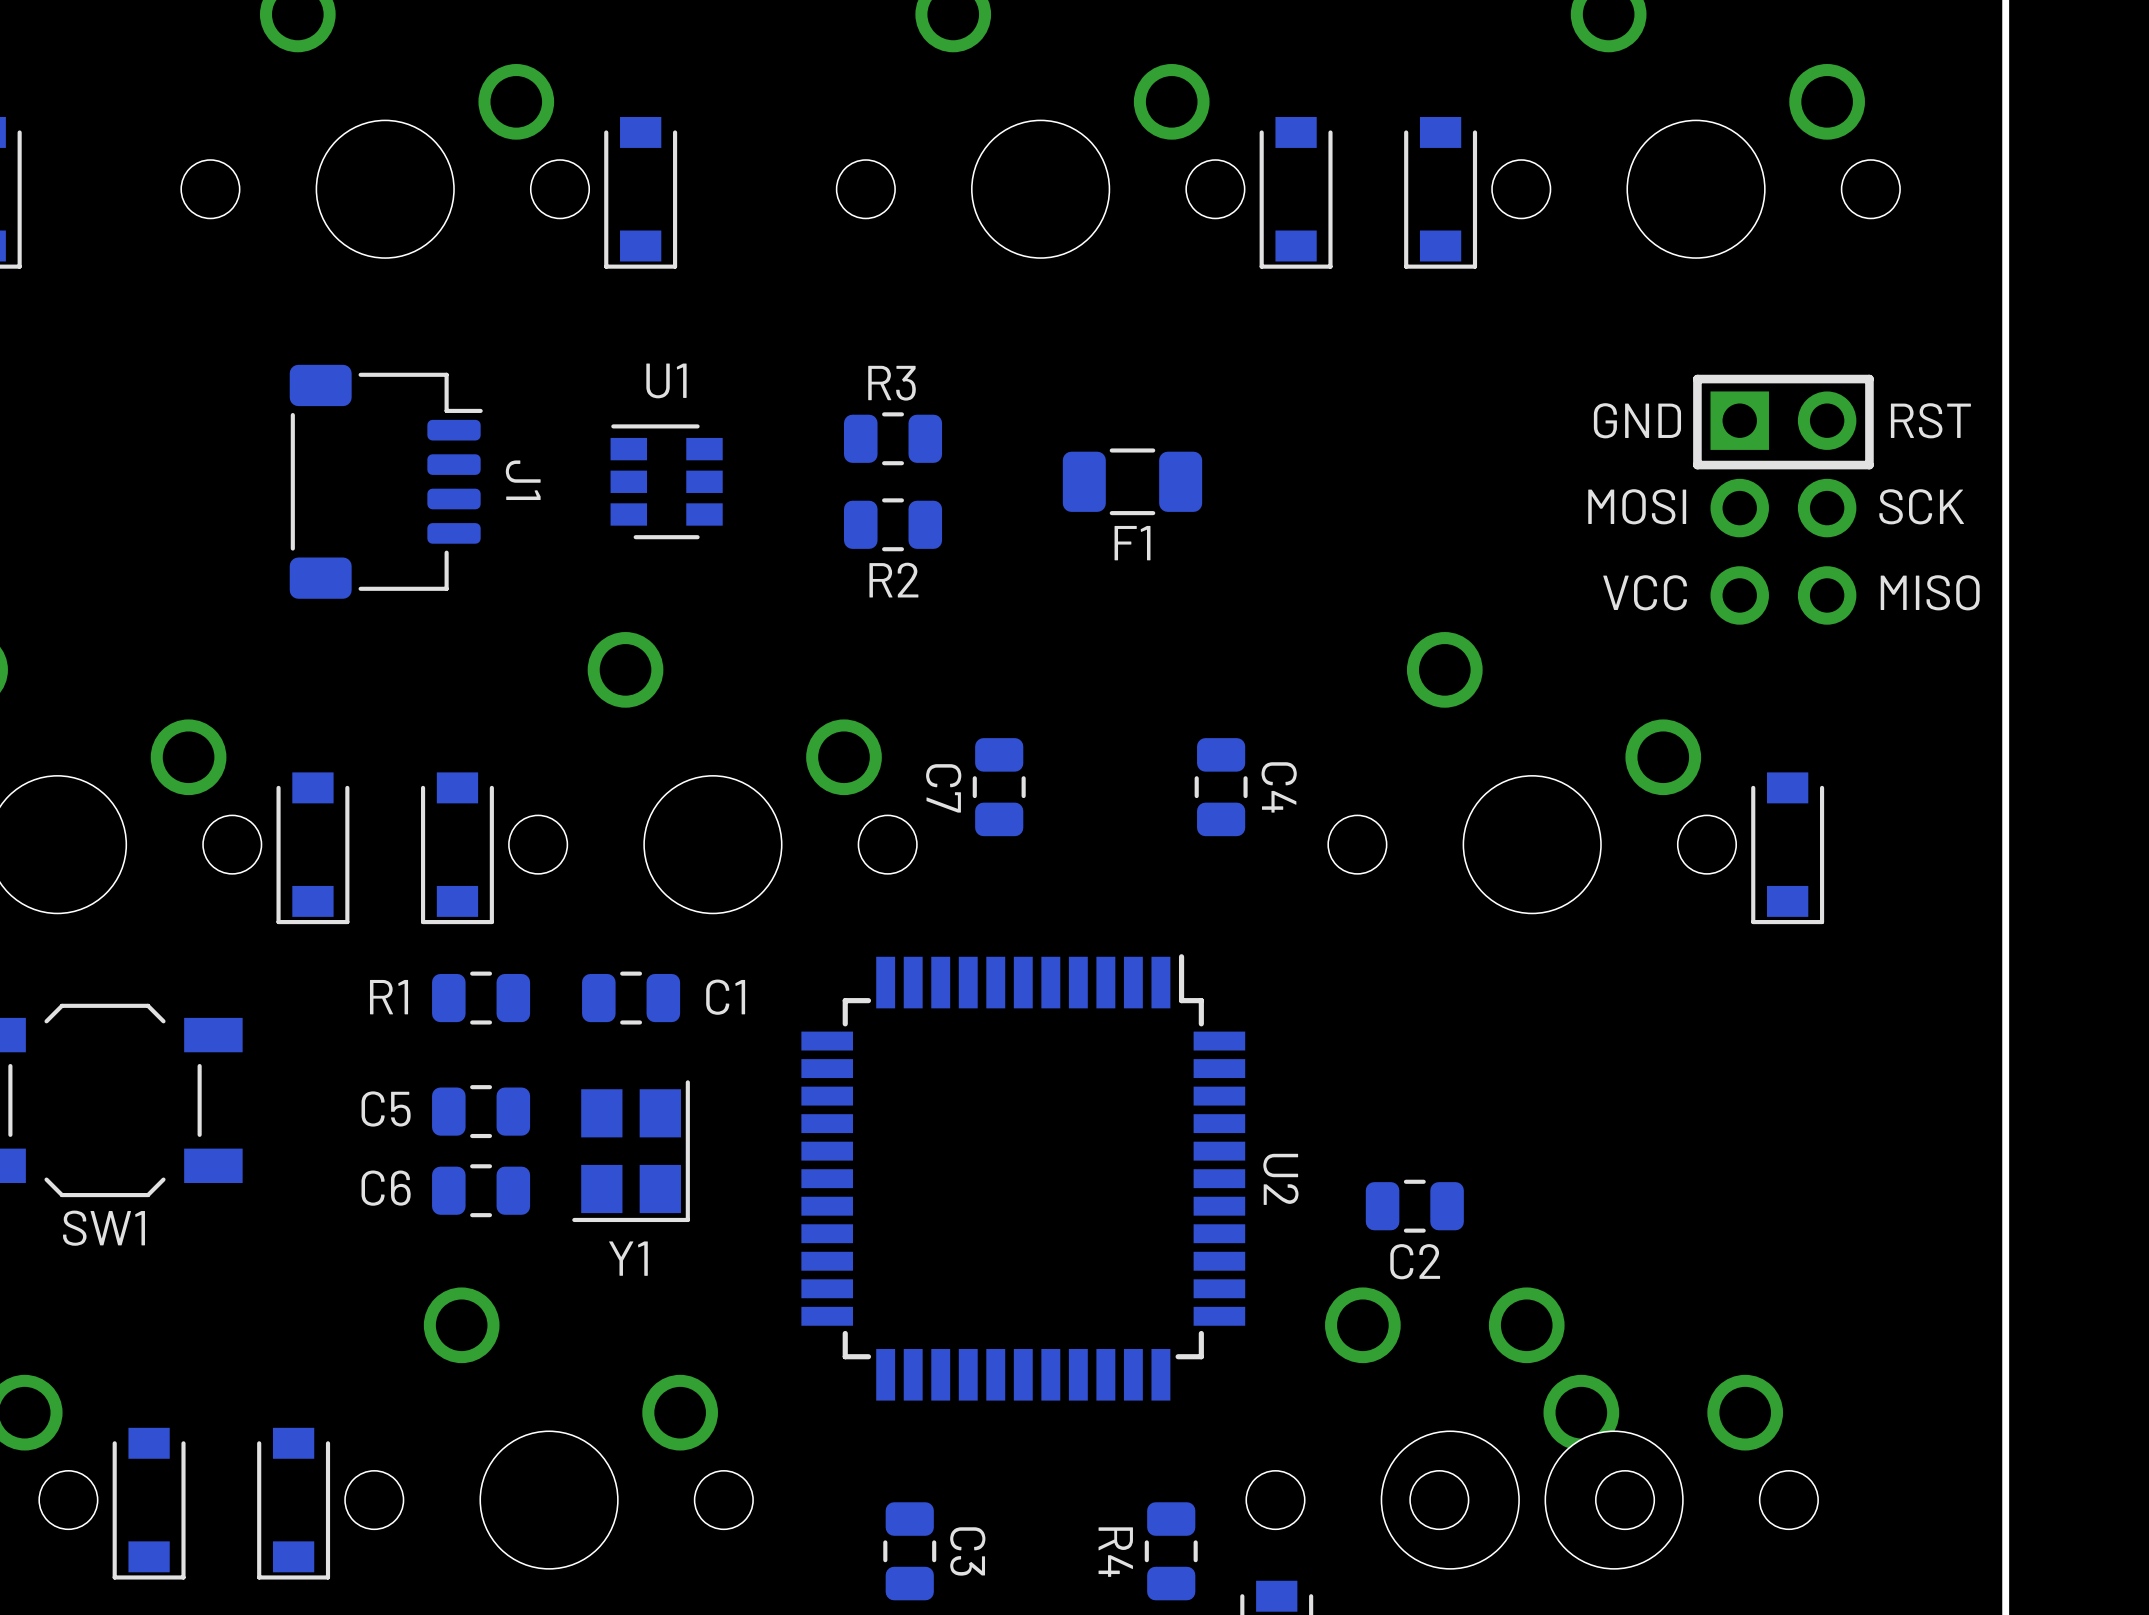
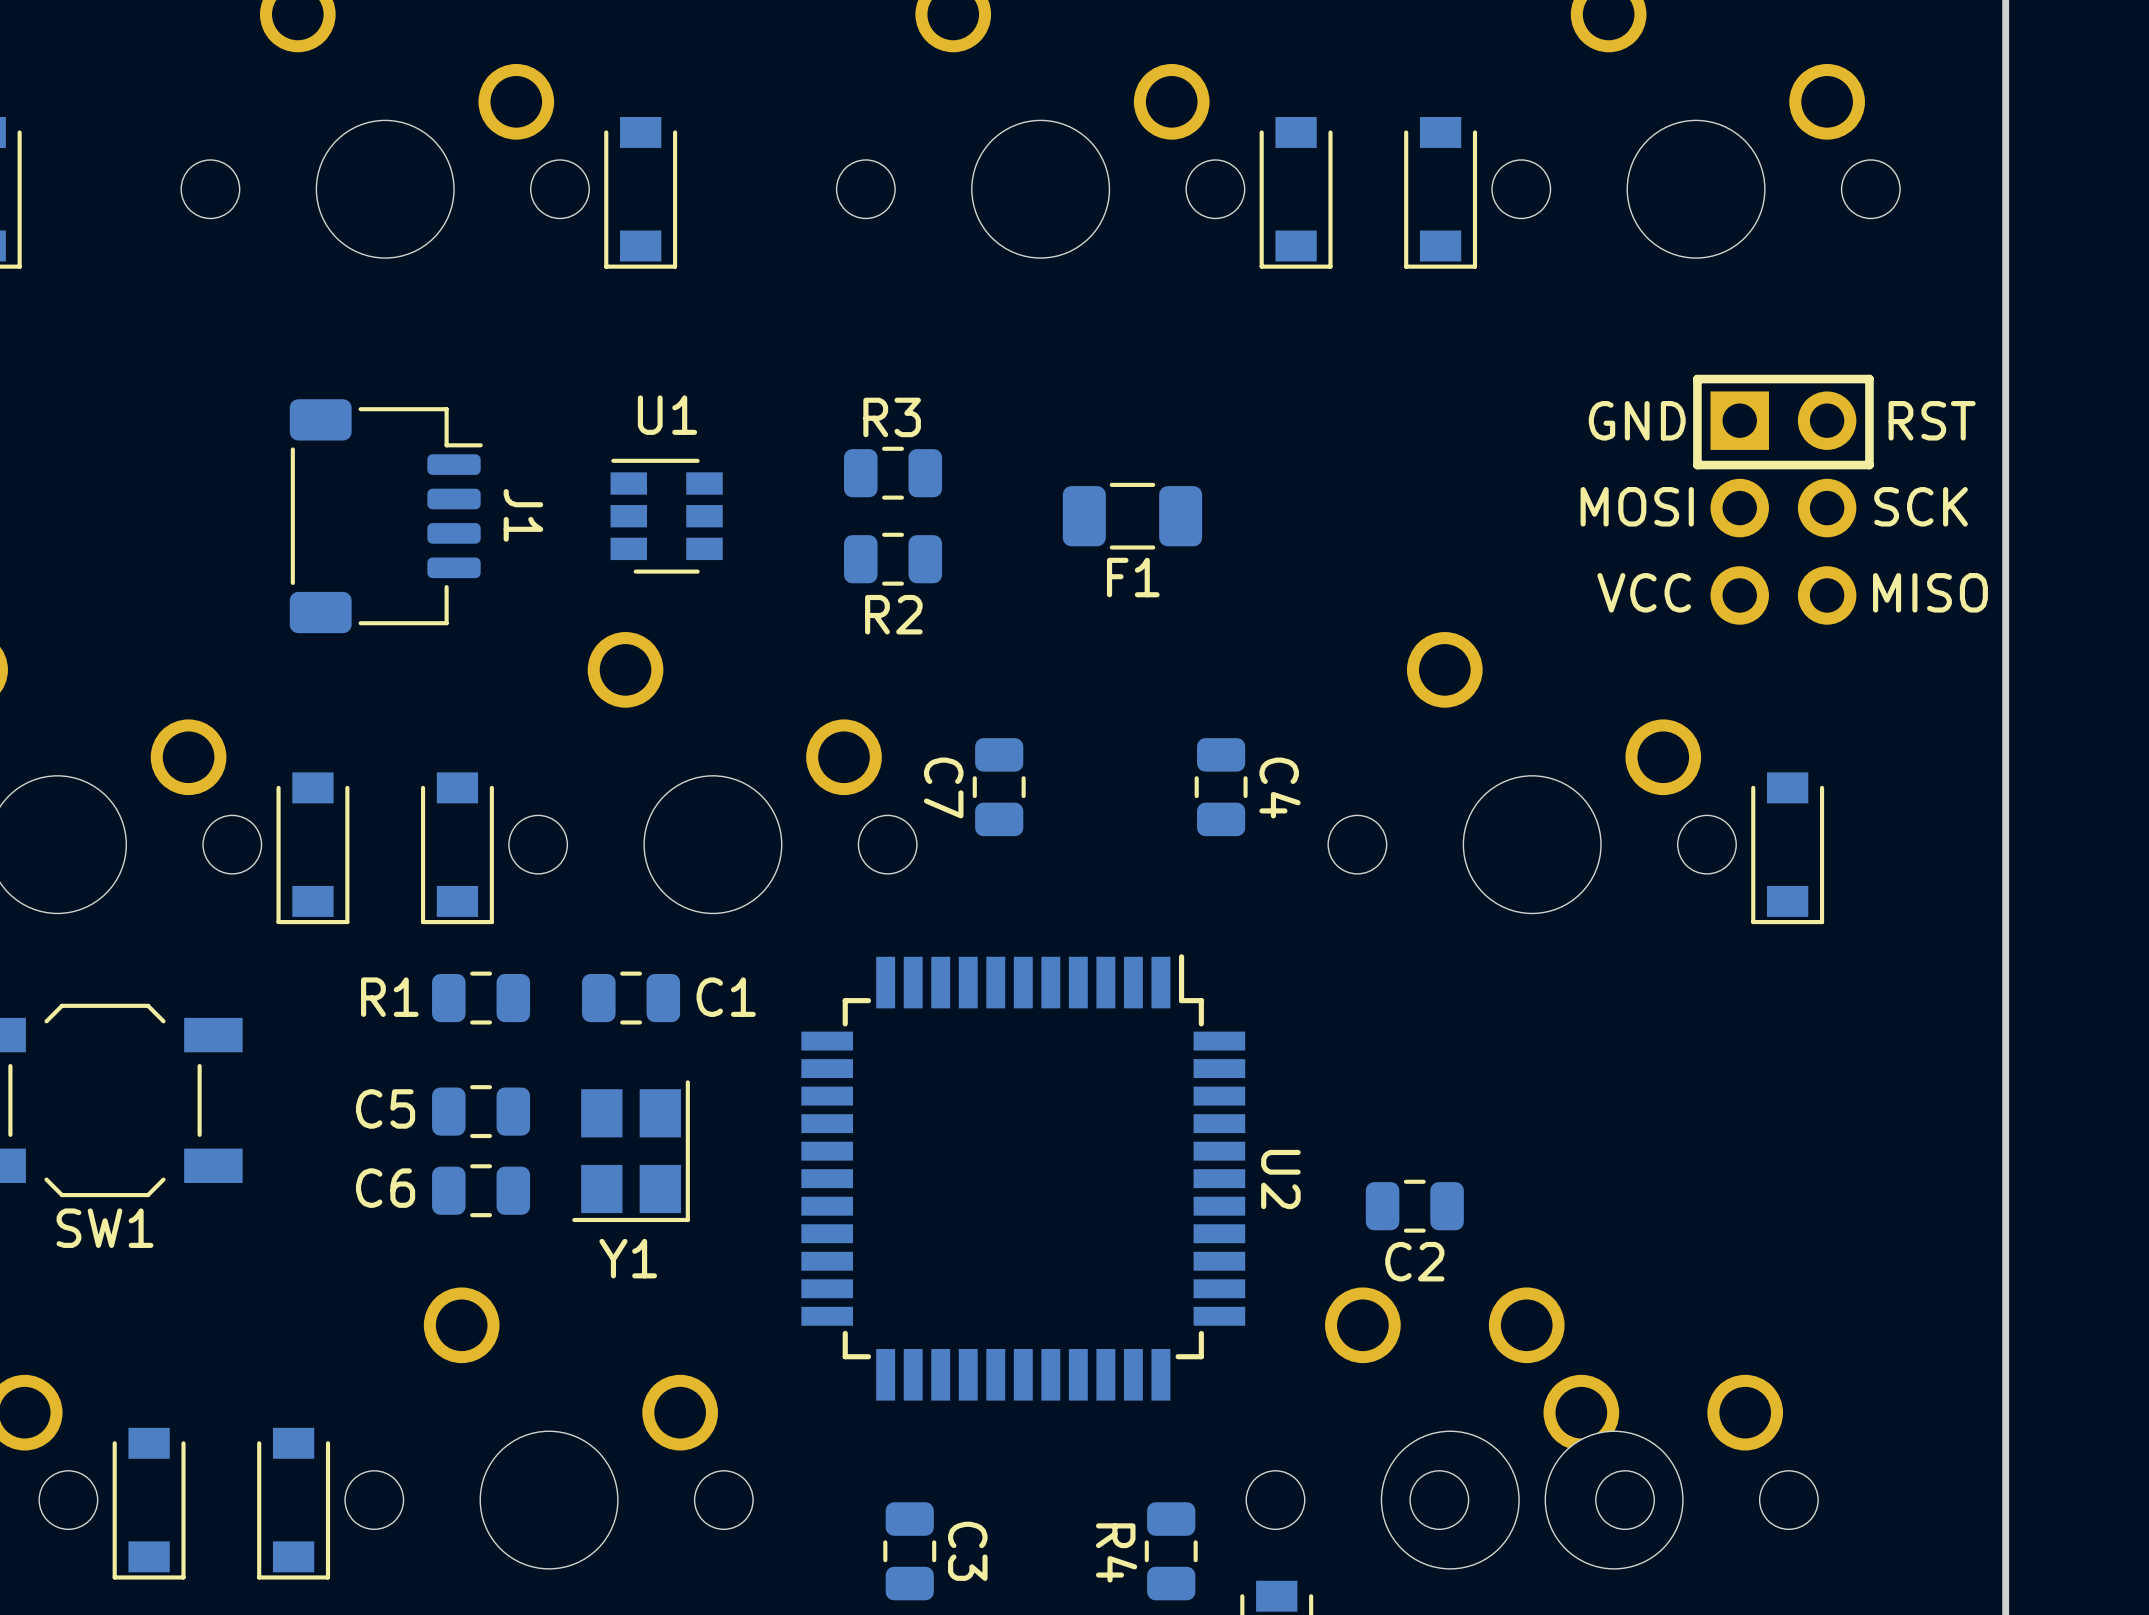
R3 position: (893, 438) -> (893, 473)
J1 position: (386, 481) -> (386, 516)
U1 position: (666, 481) -> (666, 516)
F1 position: (1132, 481) -> (1132, 516)
R2 position: (893, 524) -> (893, 559)

